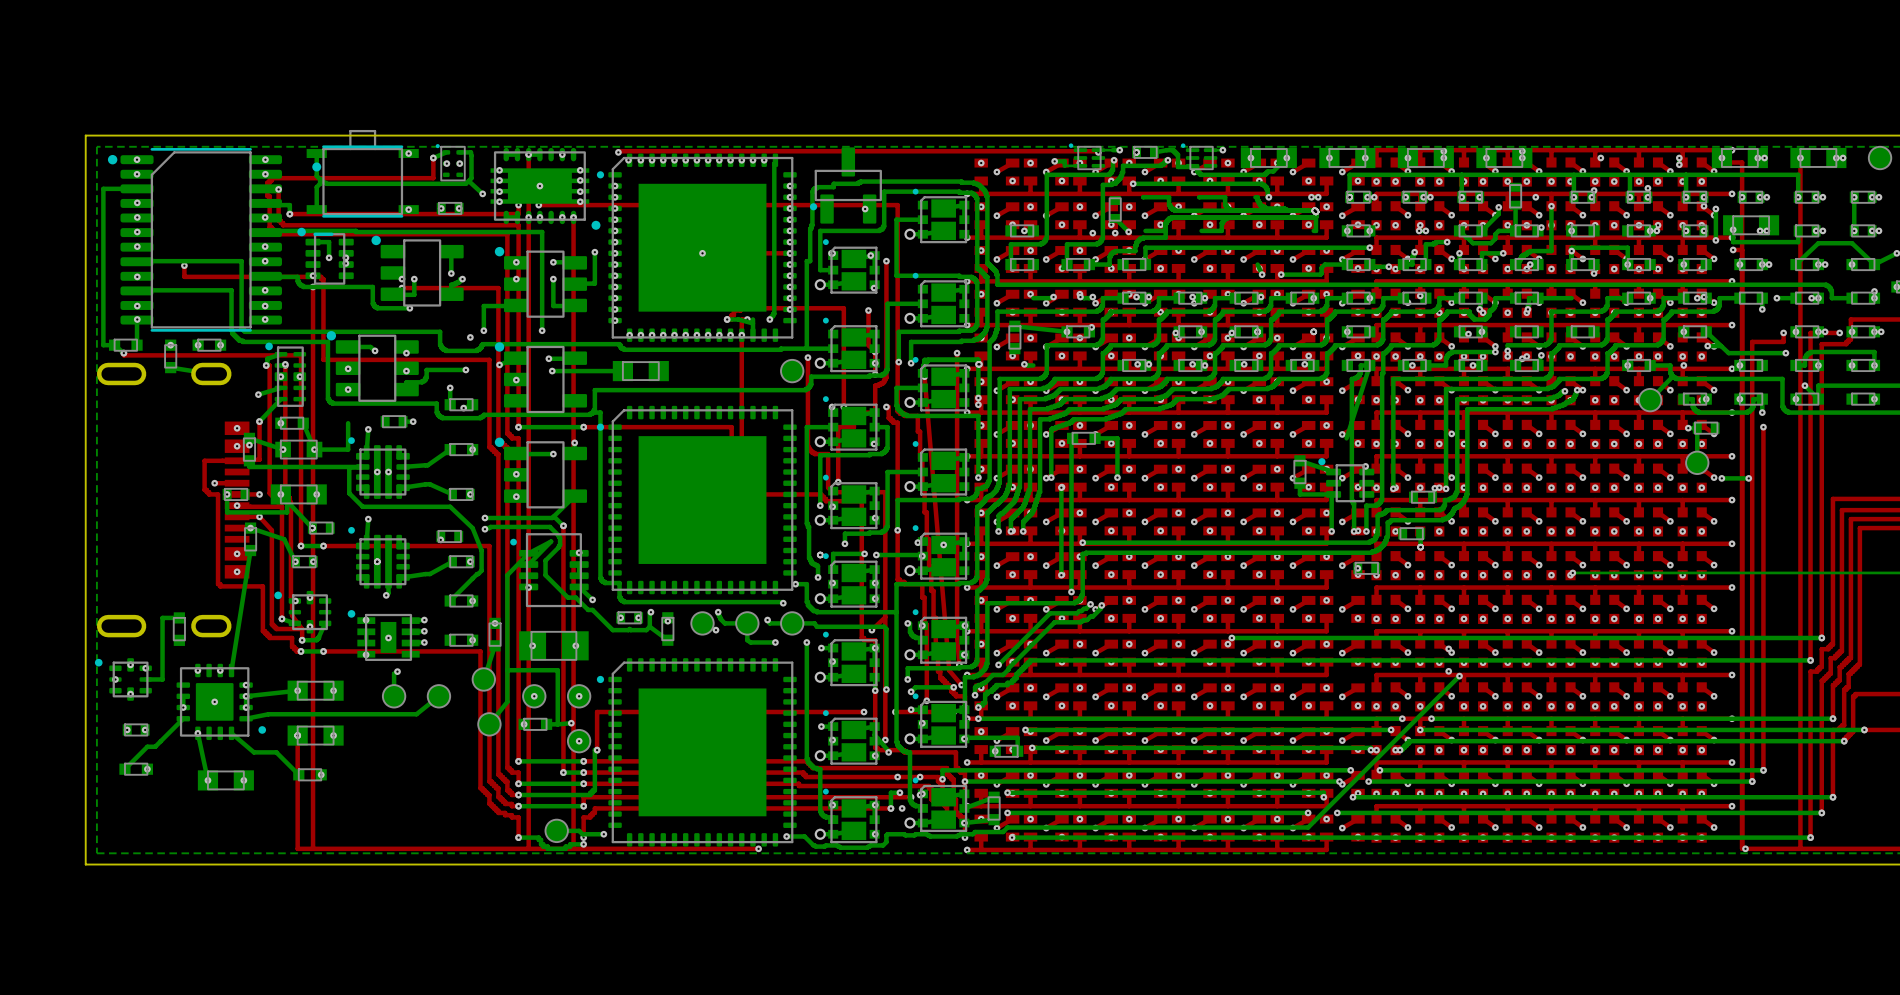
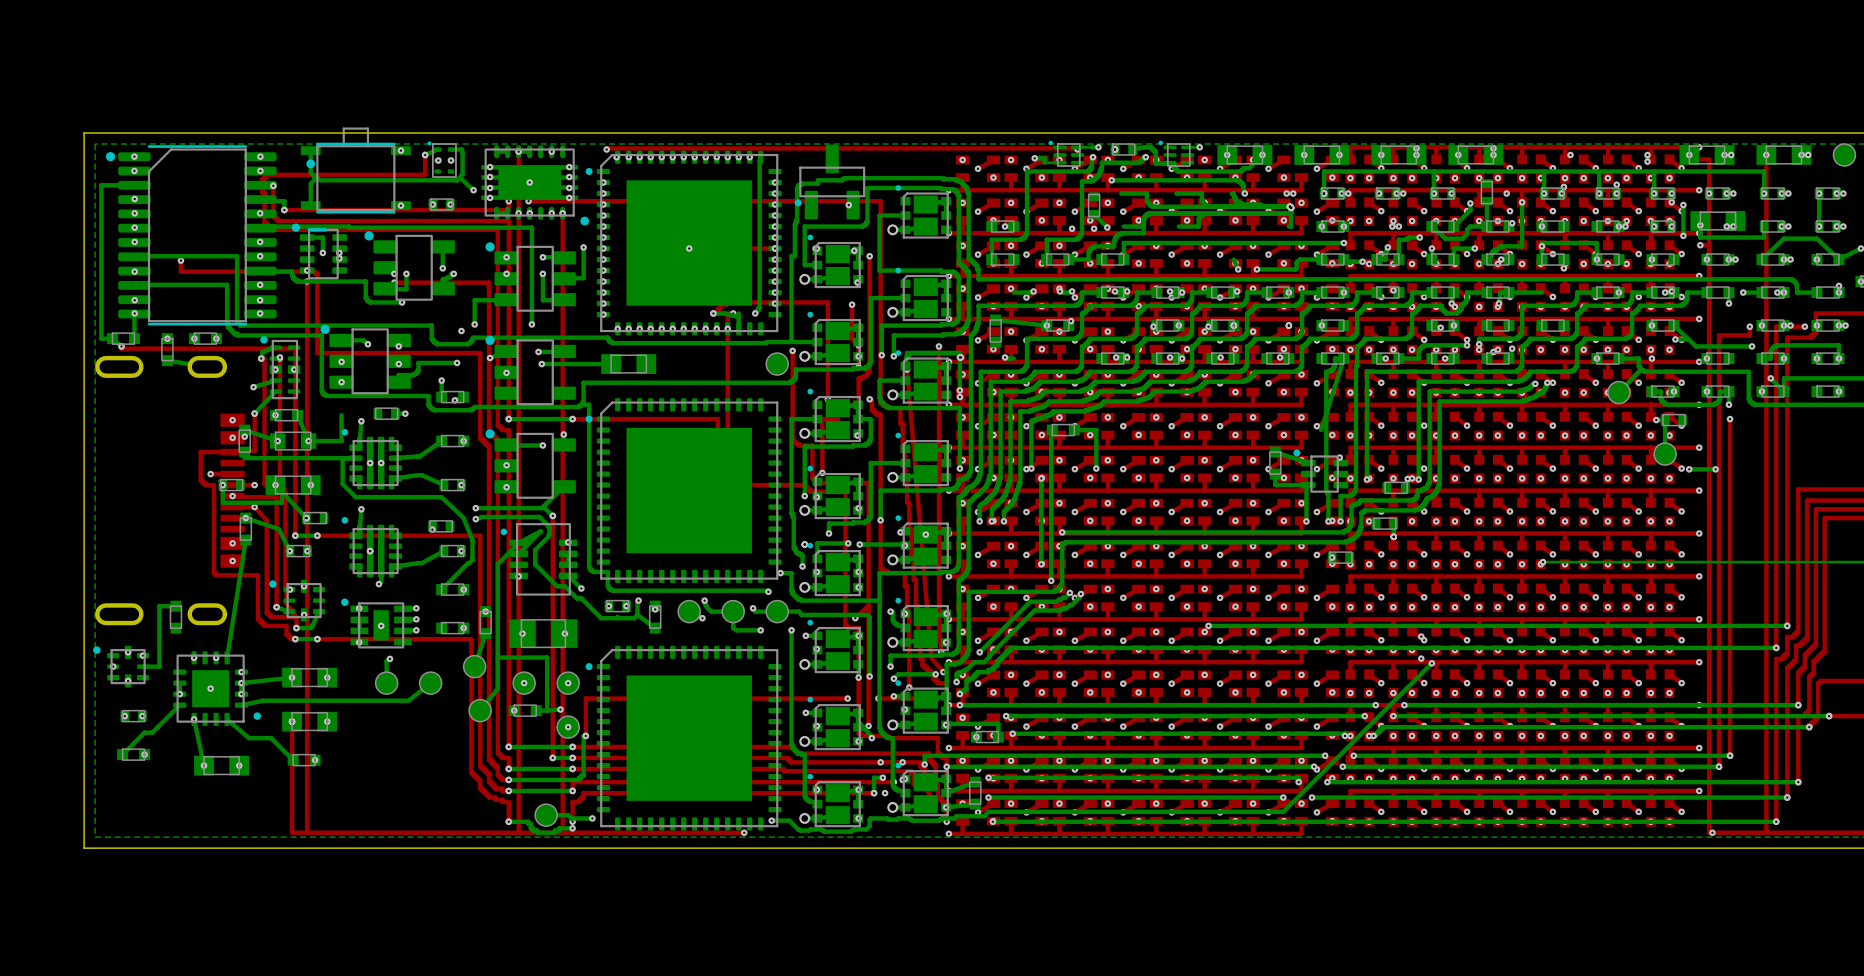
via: (832, 406) -> none

